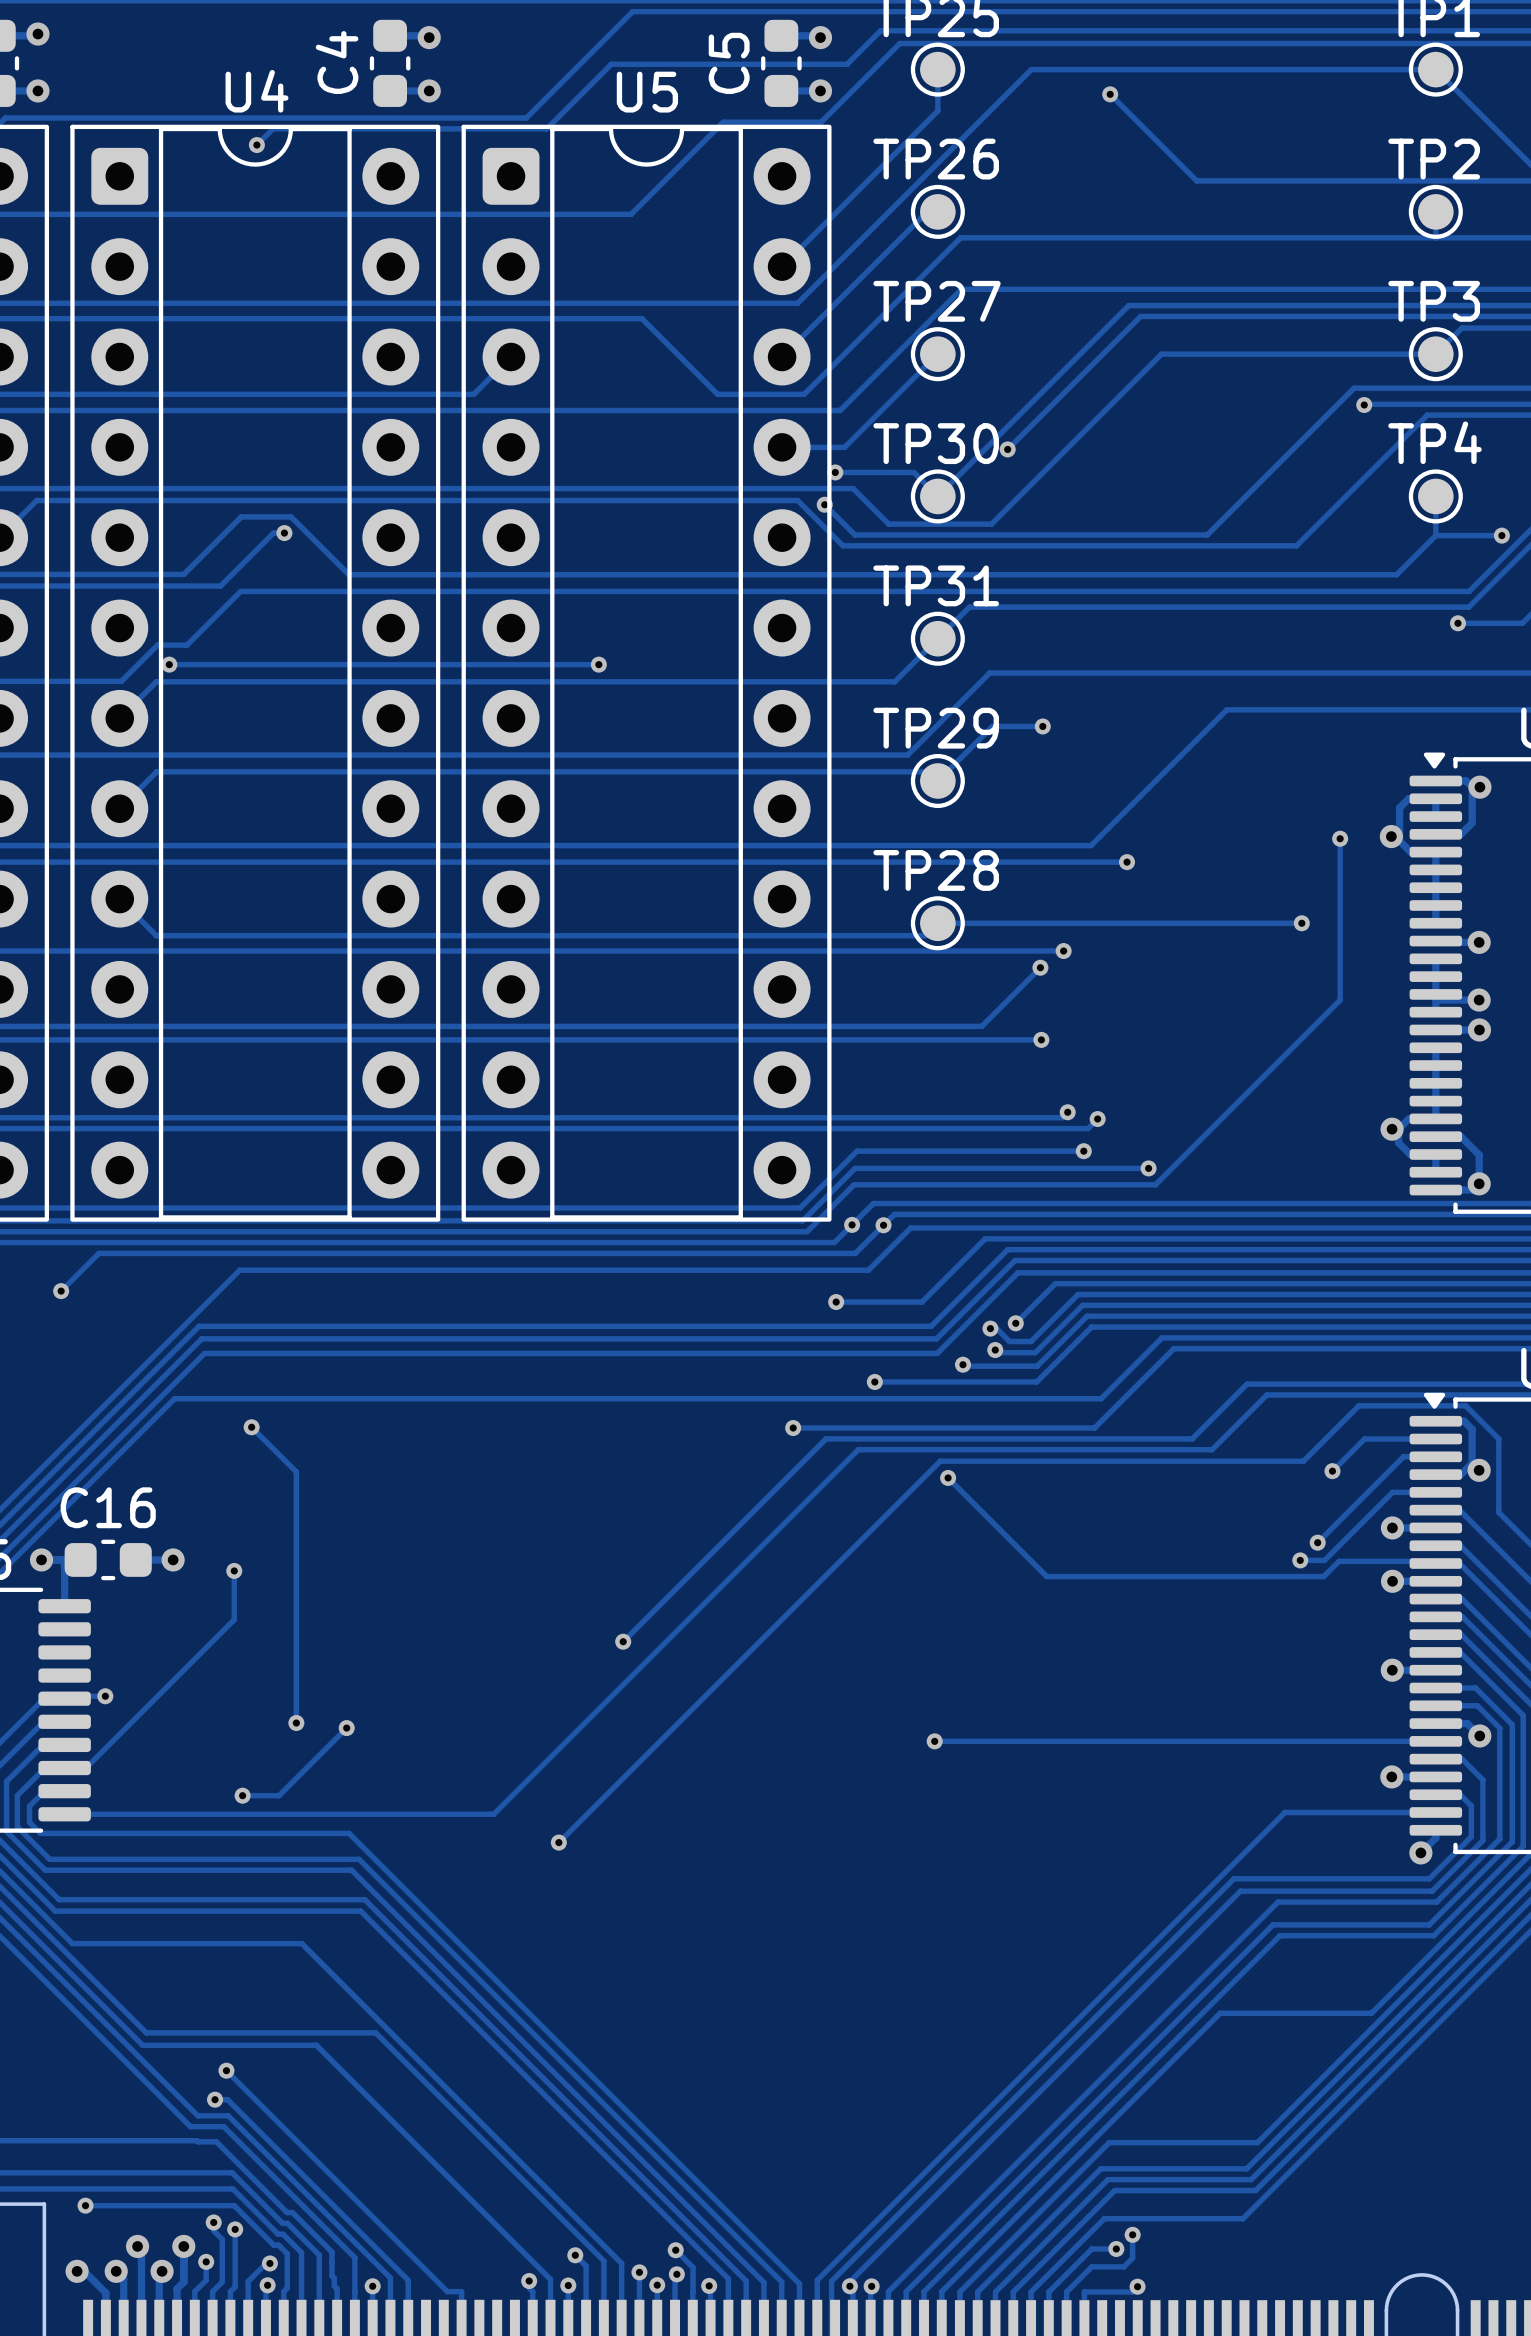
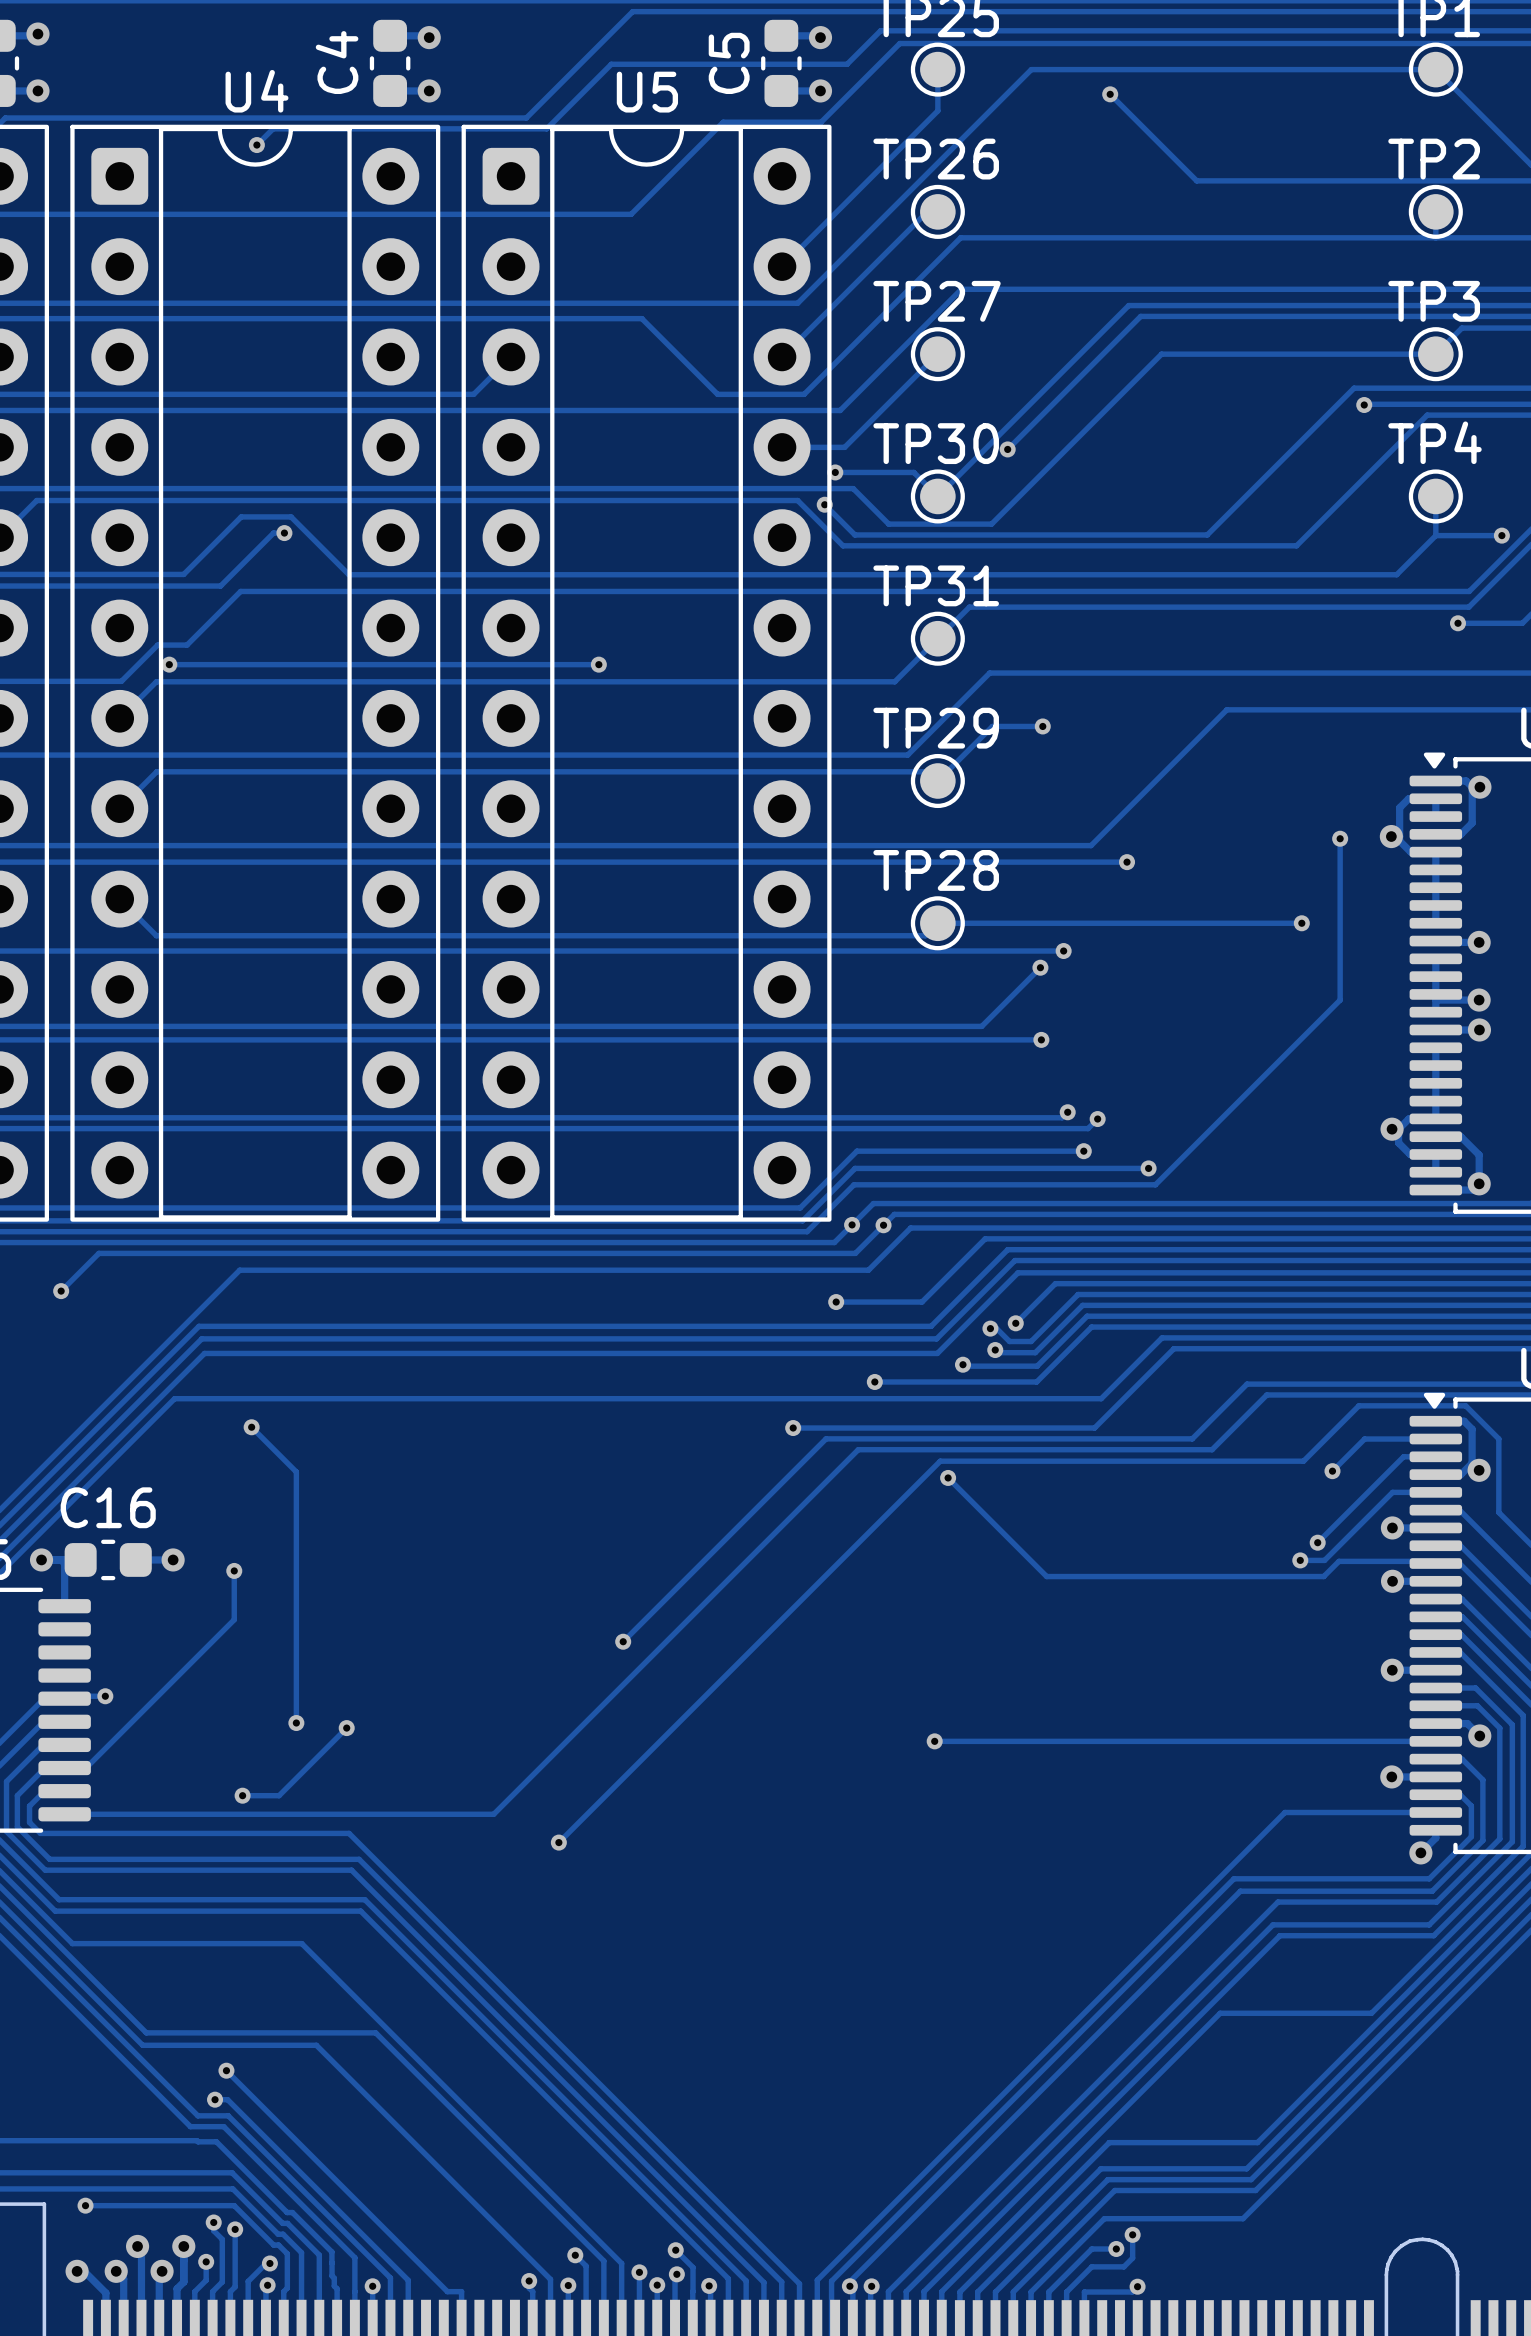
board edge: (1386, 2310) (1388, 2297) (1398, 2283) (1409, 2277) (1421, 2274) (1438, 2278) (1448, 2286) (1455, 2297) (1457, 2310) -> (1386, 2310) (1386, 2269) (1391, 2257) (1401, 2245) (1409, 2241) (1422, 2239) (1441, 2245) (1447, 2250) (1455, 2262) (1457, 2271) (1457, 2310)

